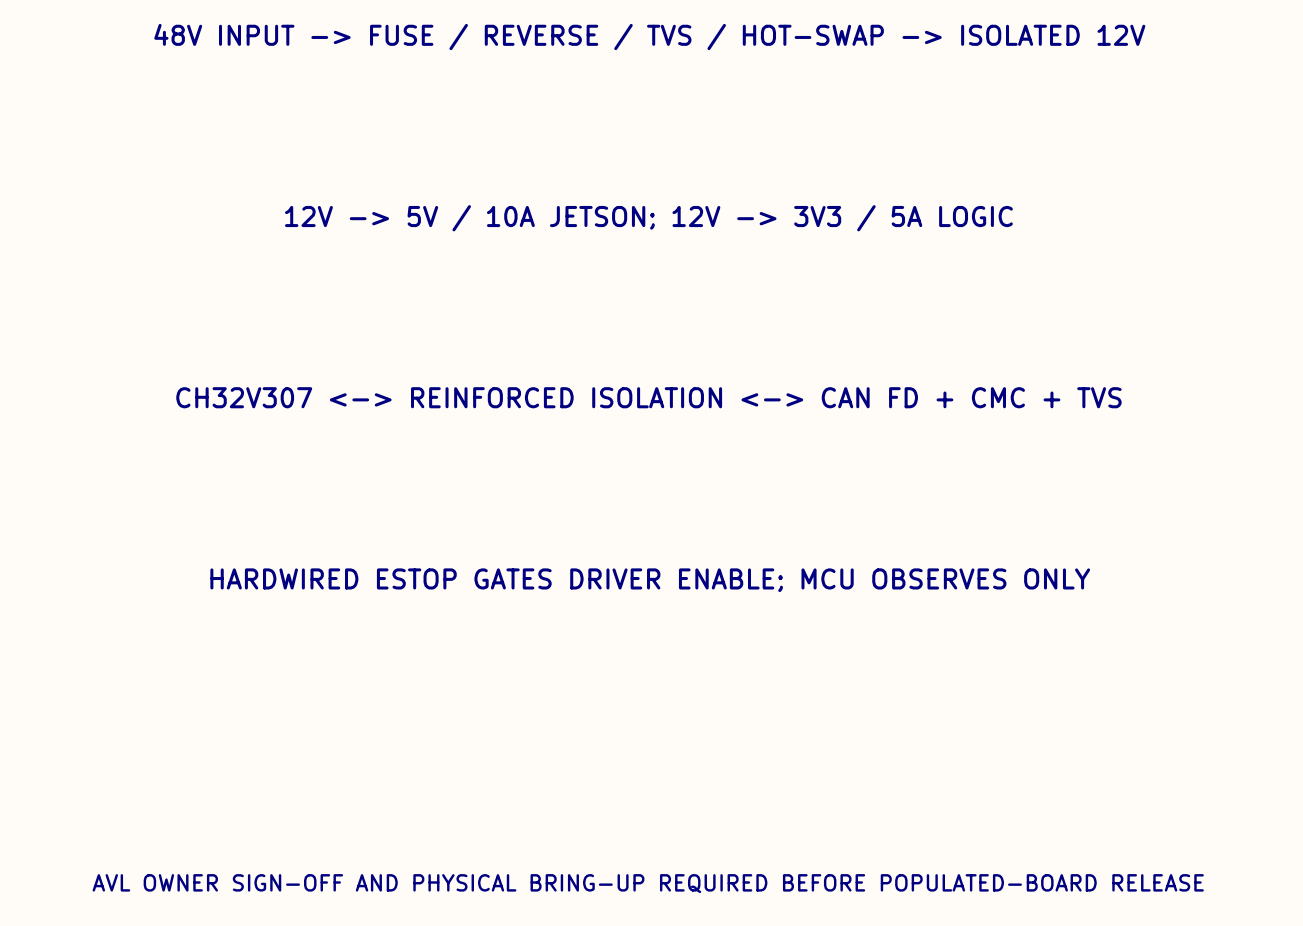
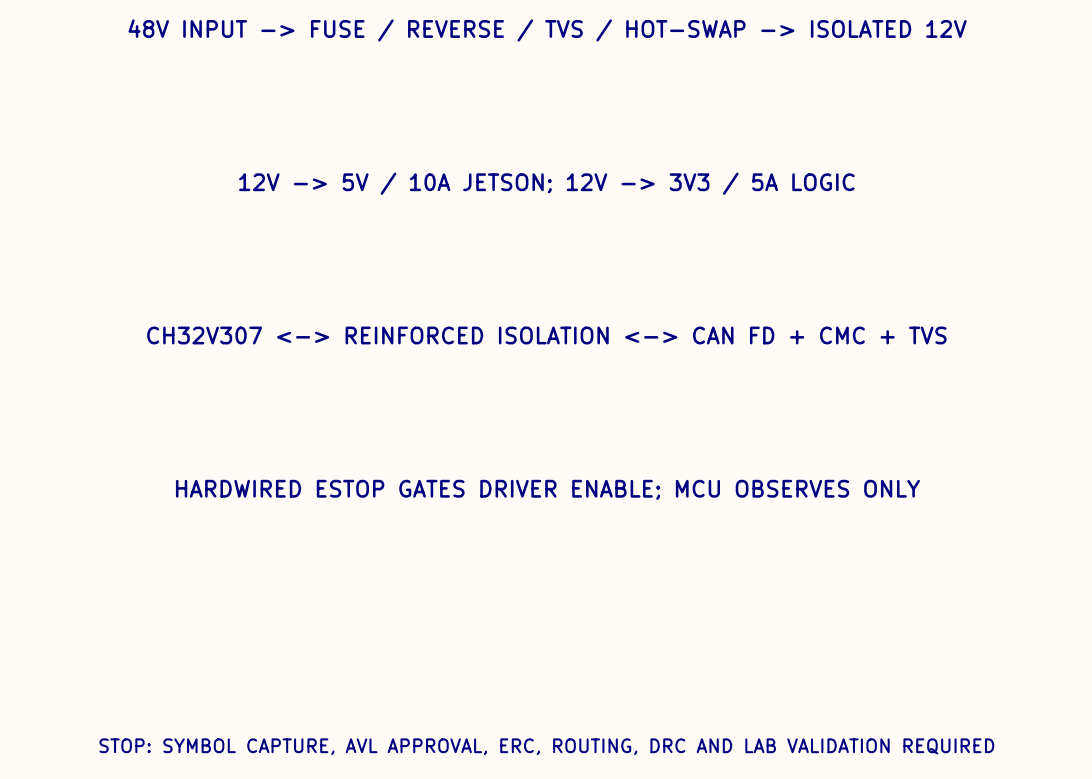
text: AVL OWNER SIGN-OFF AND PHYSICAL BRING-UP REQUIRED BEFORE POPULATED-BOARD RELEASE (648, 883) -> STOP: SYMBOL CAPTURE, AVL APPROVAL, ERC, ROUTING, DRC AND LAB VALIDATION REQUIRED (546, 746)

